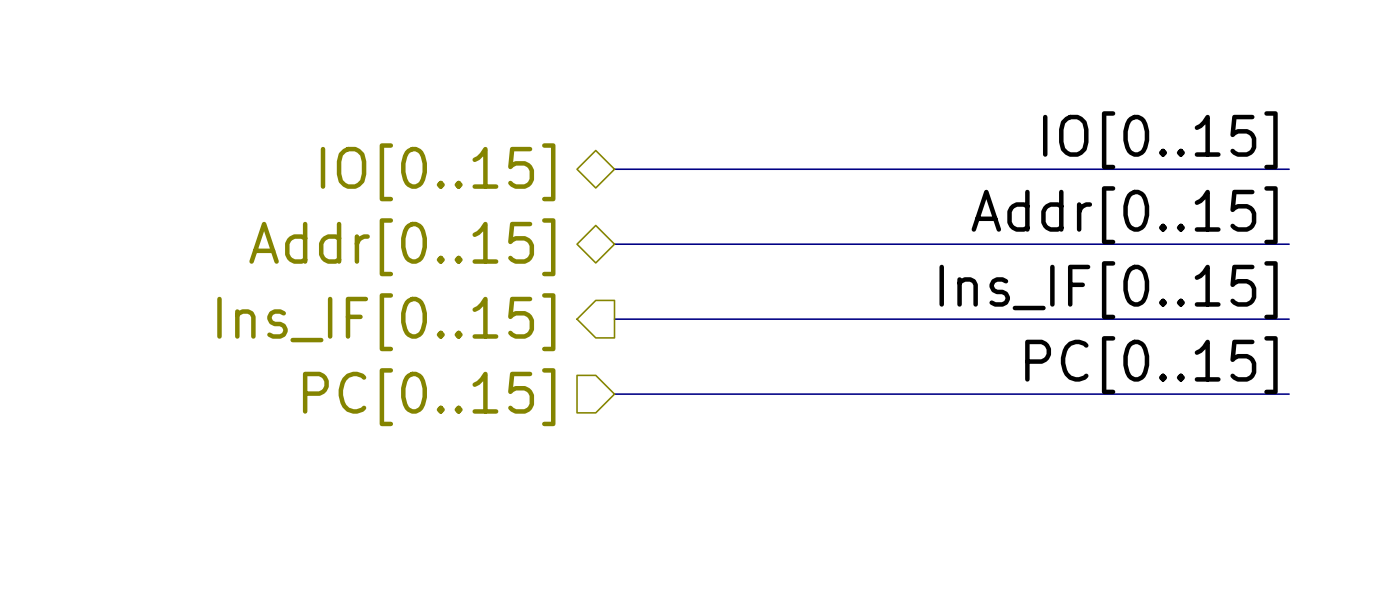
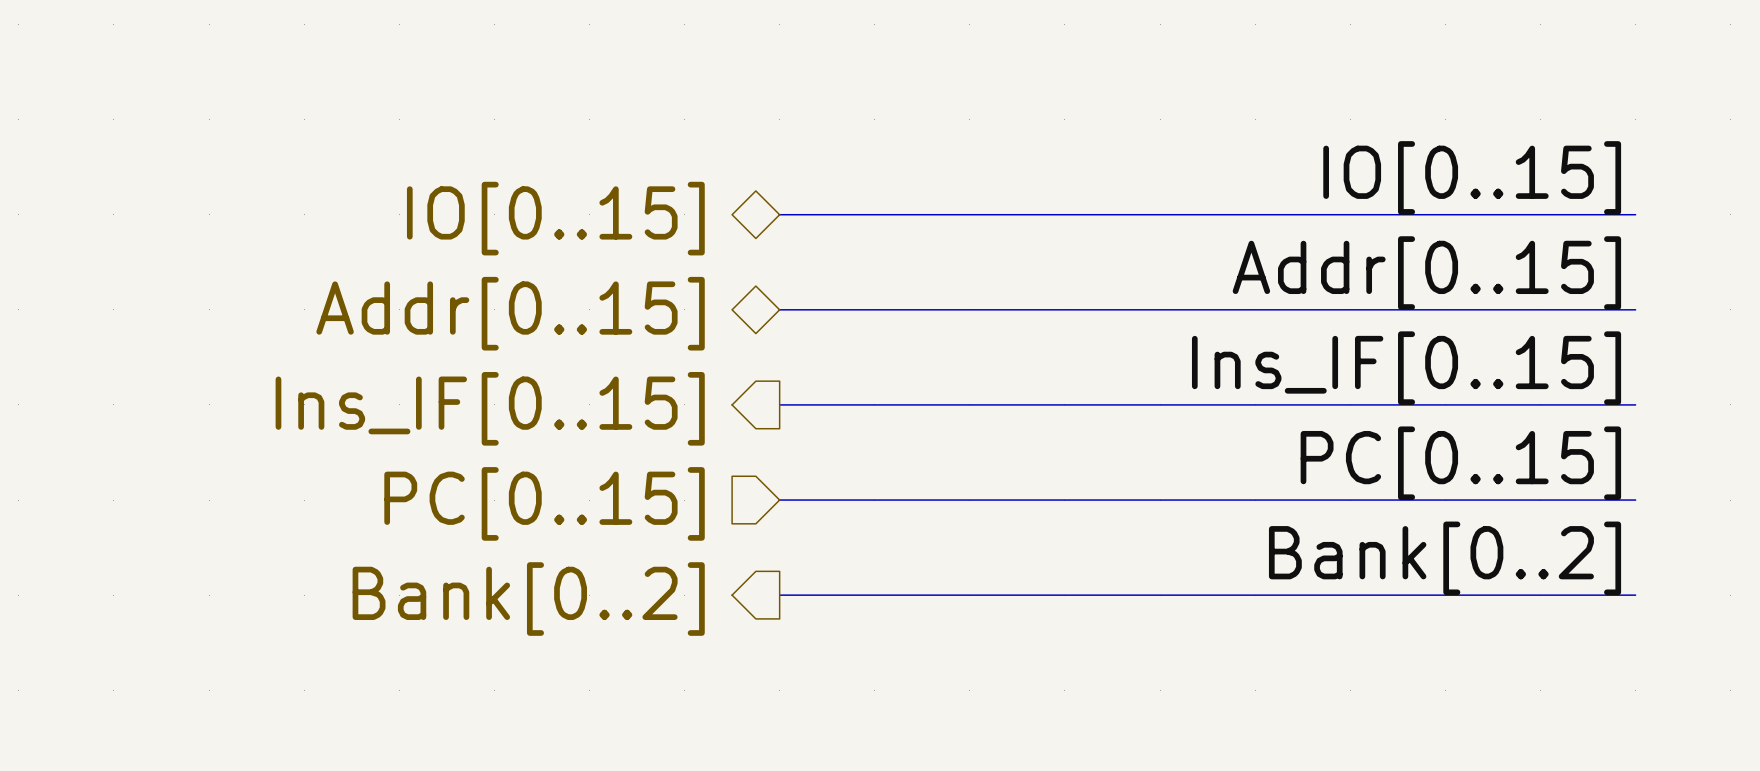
label: none -> Bank[0..2] (1445, 558)
bus: none -> (779, 595) (1635, 595)
hierarchical label: none -> Bank[0..2] (528, 599)

